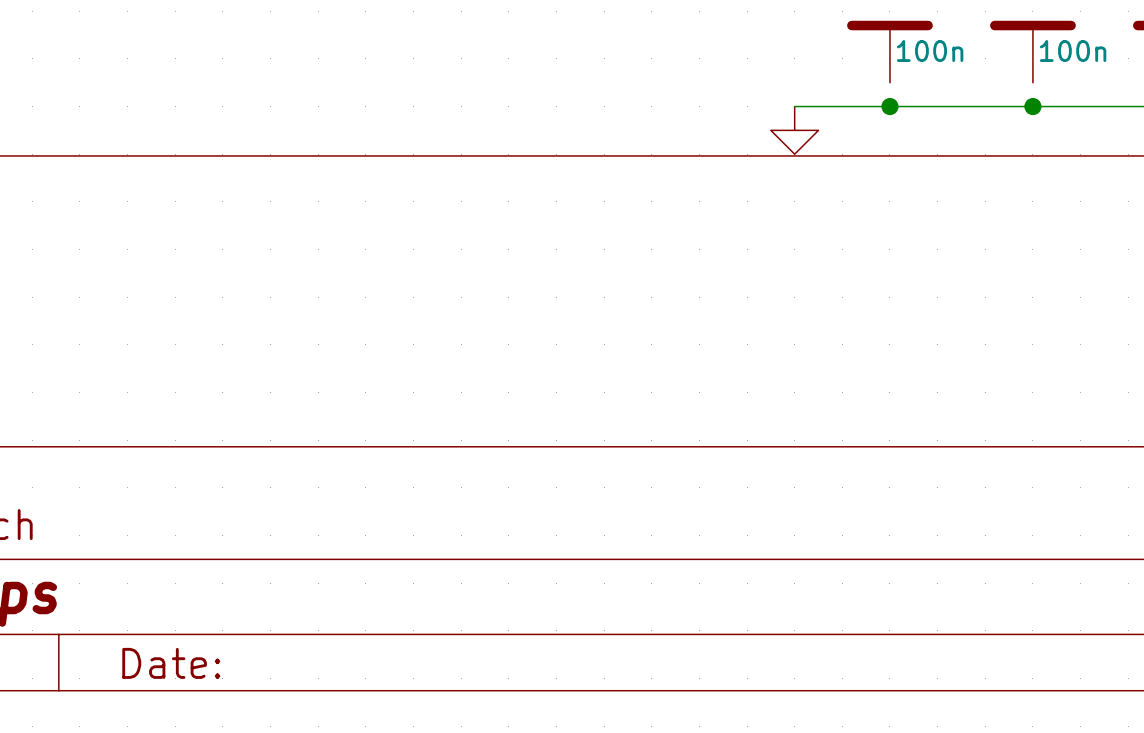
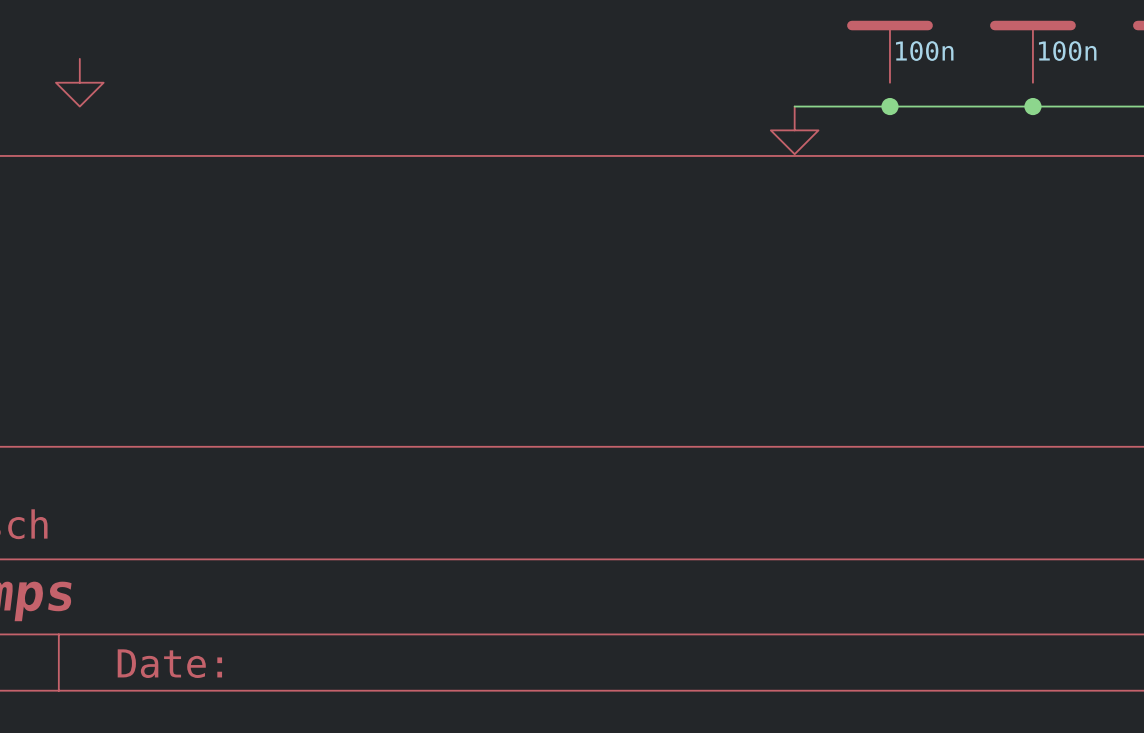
power symbol: none -> (79, 82)

